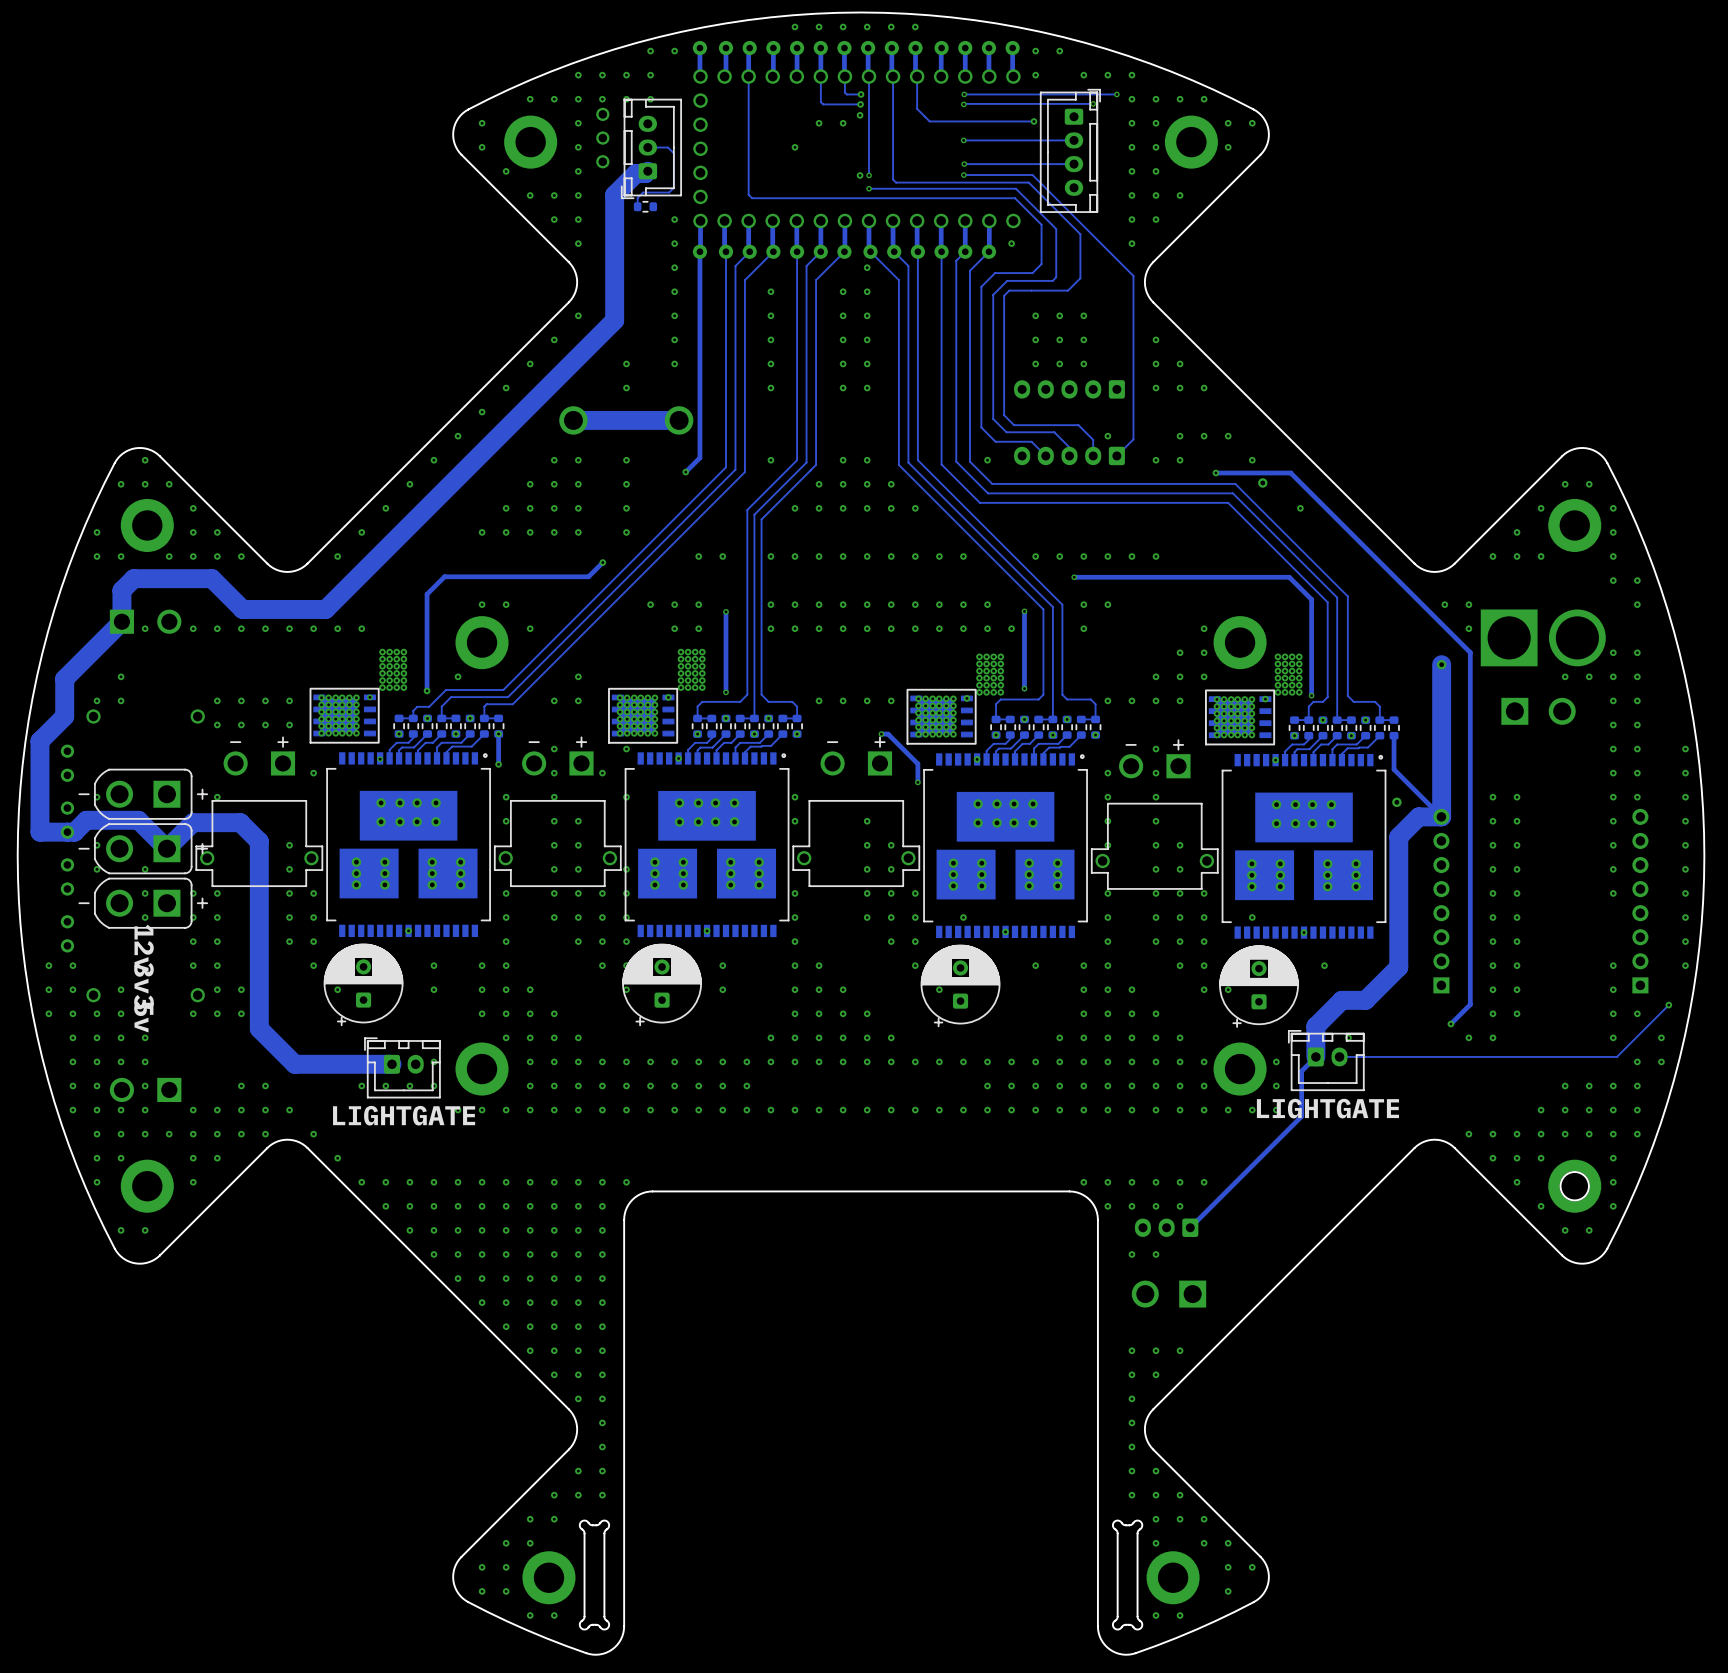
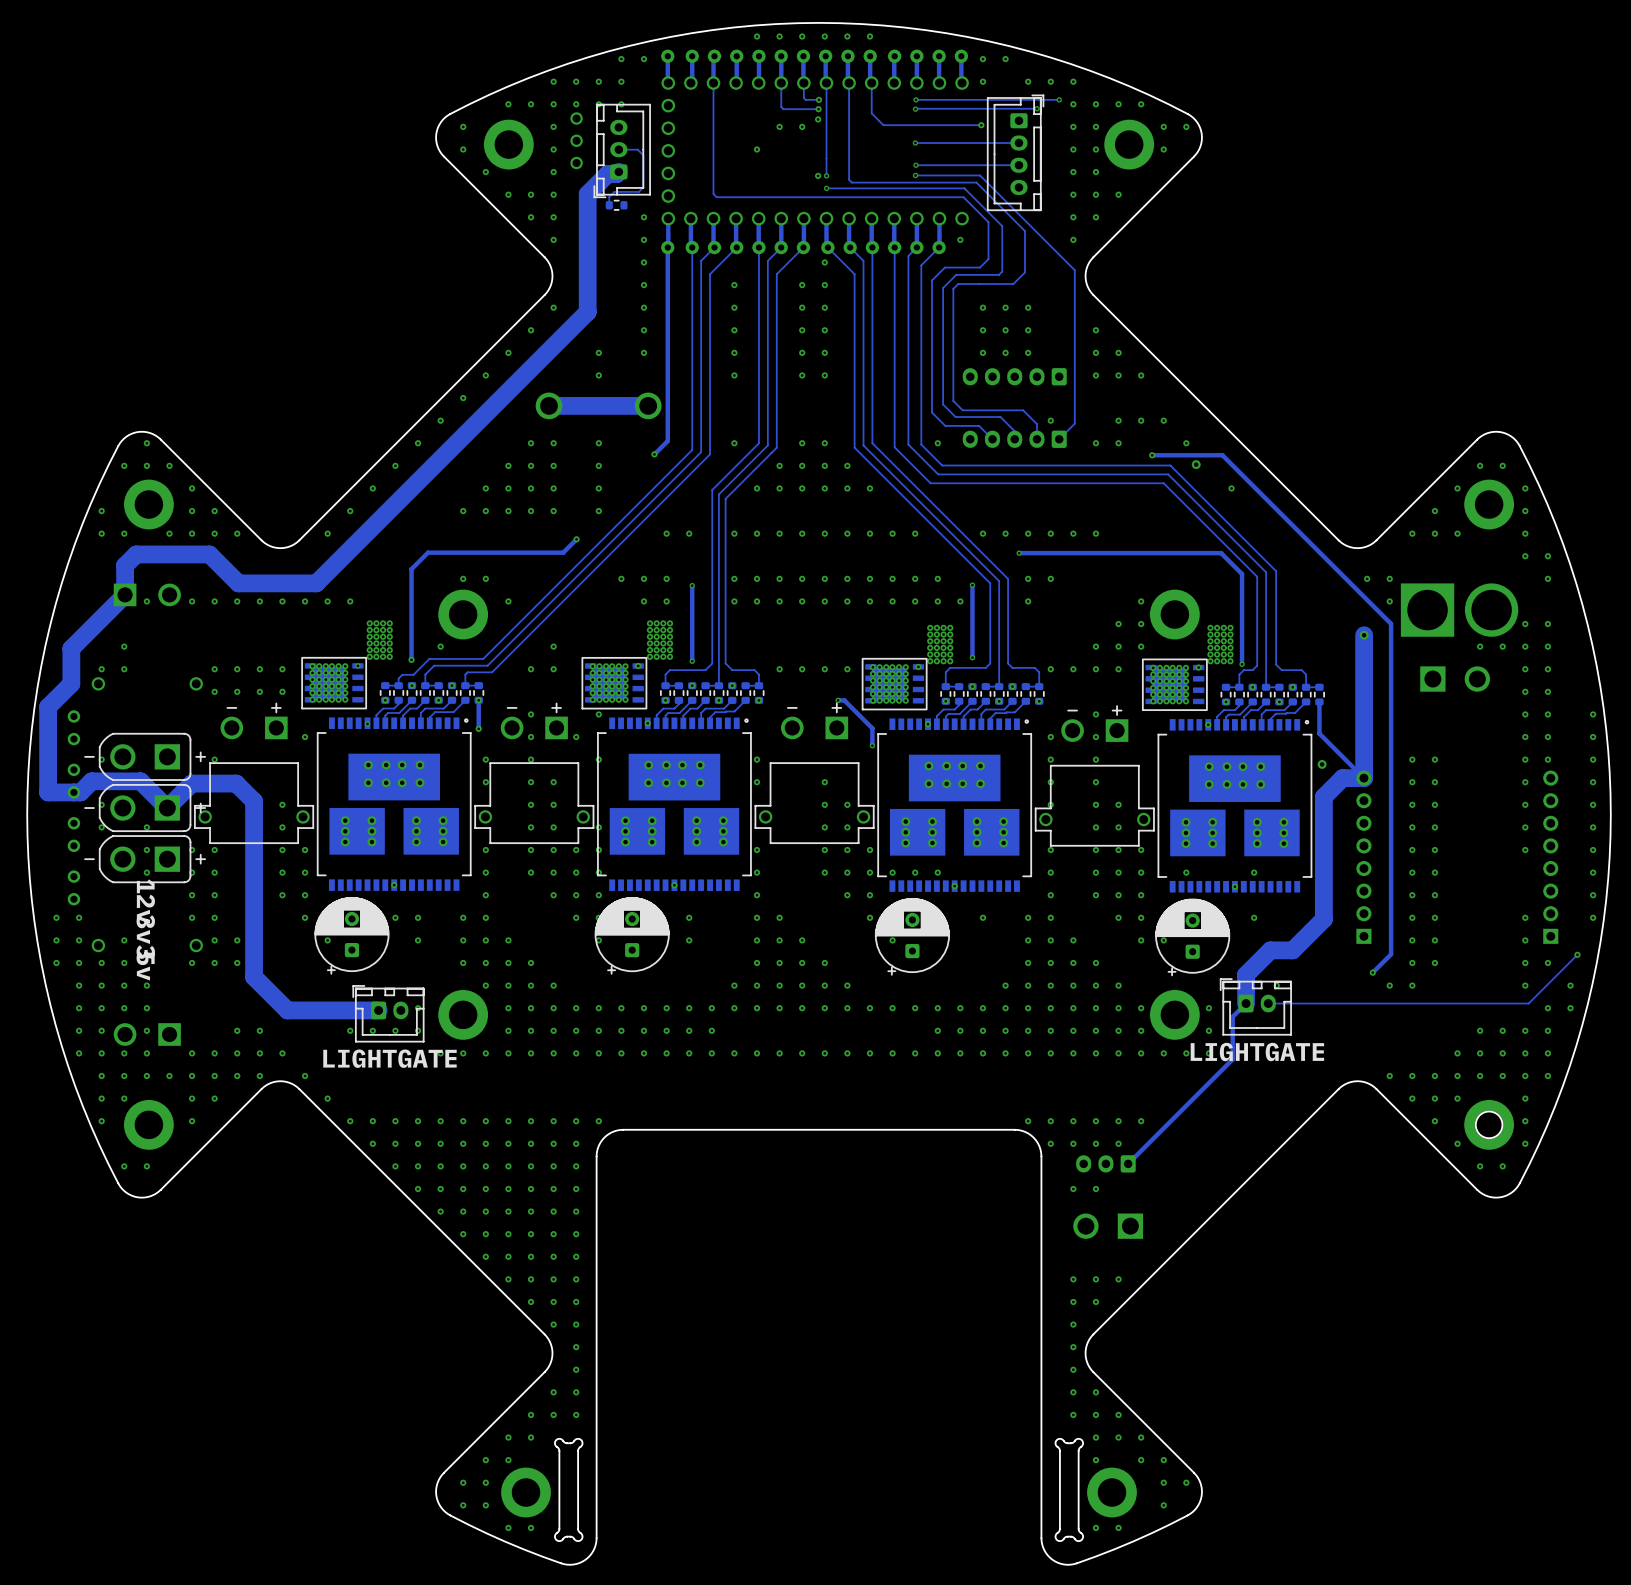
via: none -> (892, 872)
via: none -> (937, 872)
via: none -> (1254, 872)
via: none -> (395, 917)

